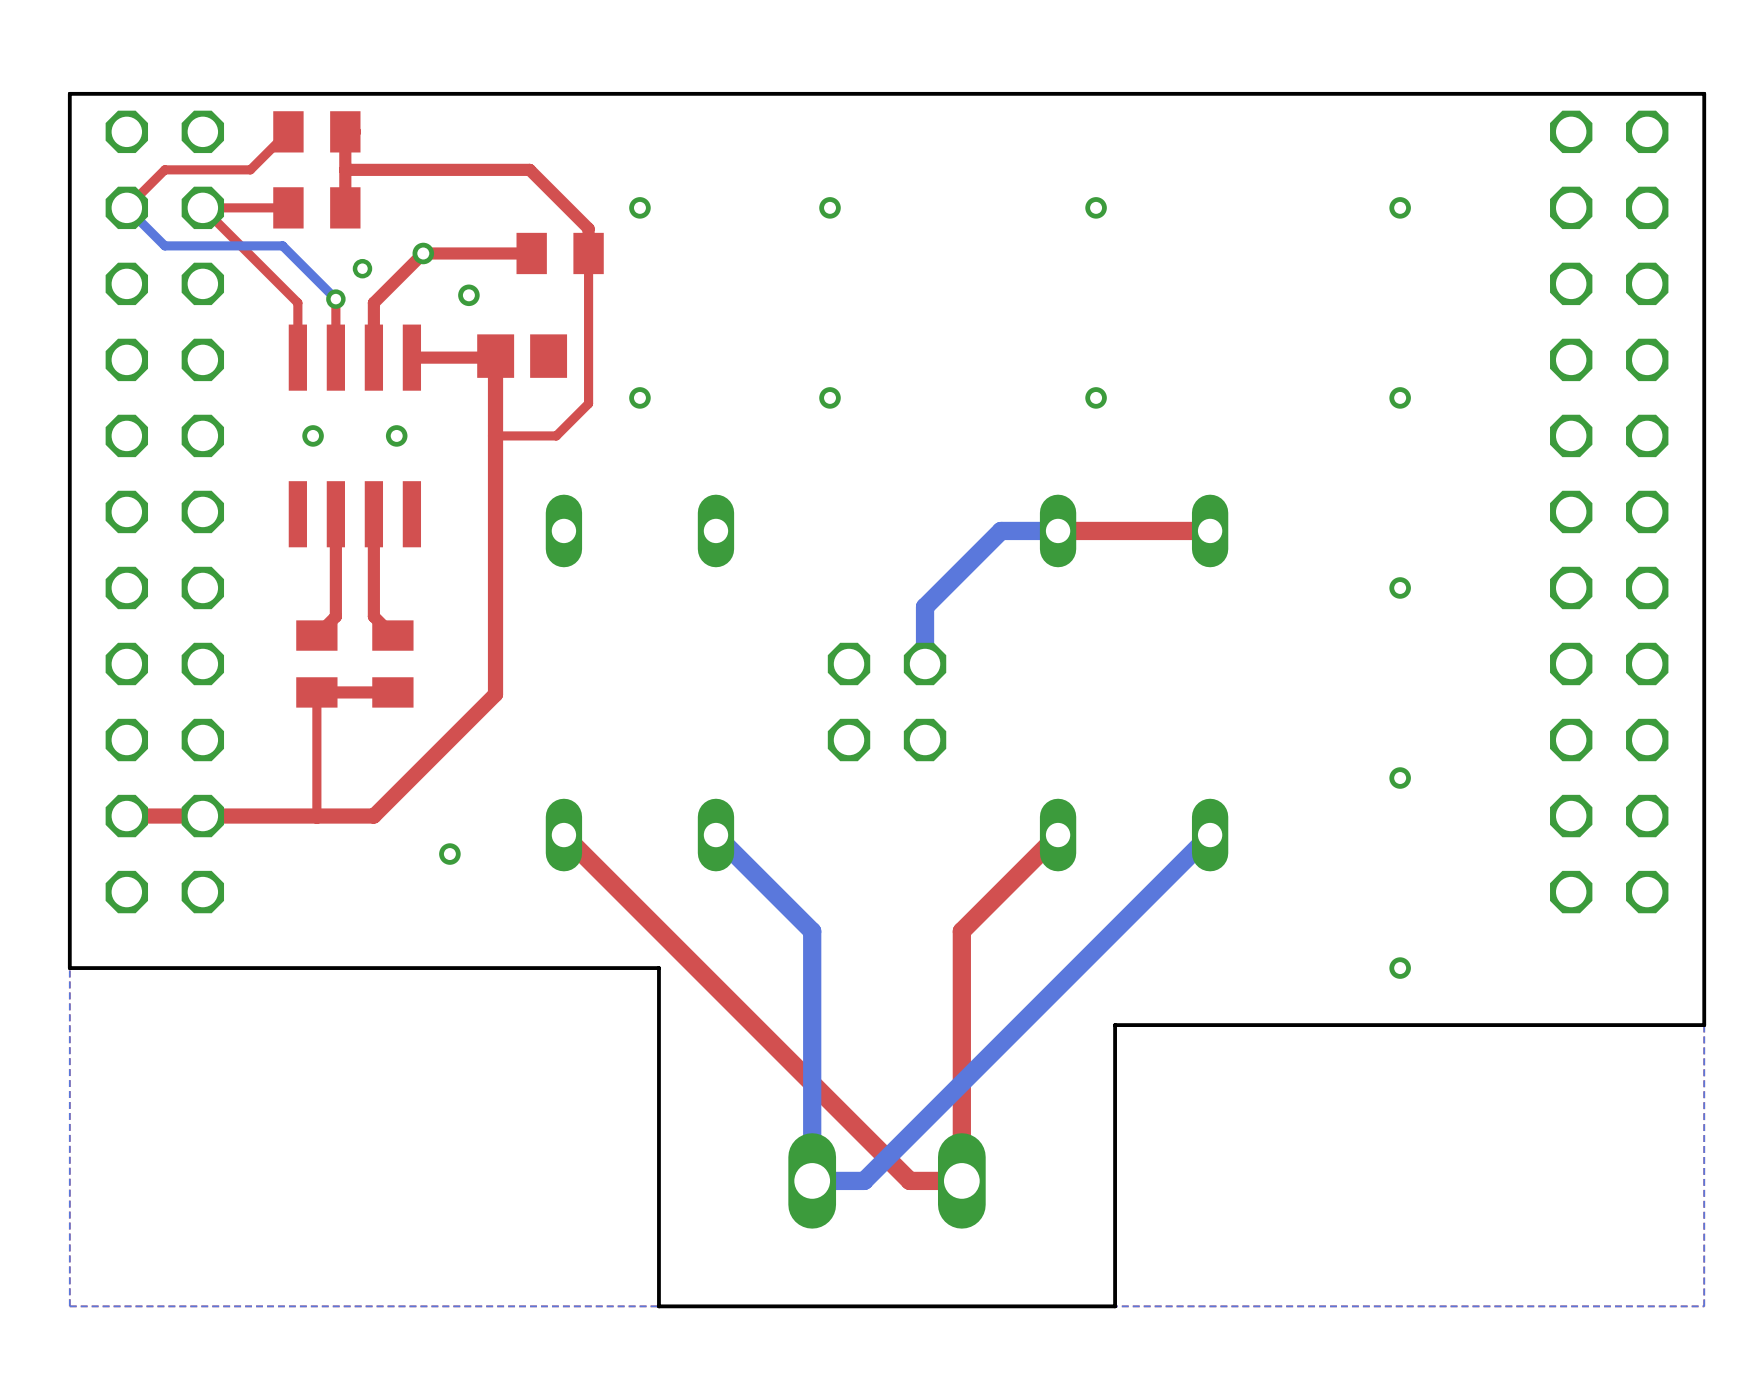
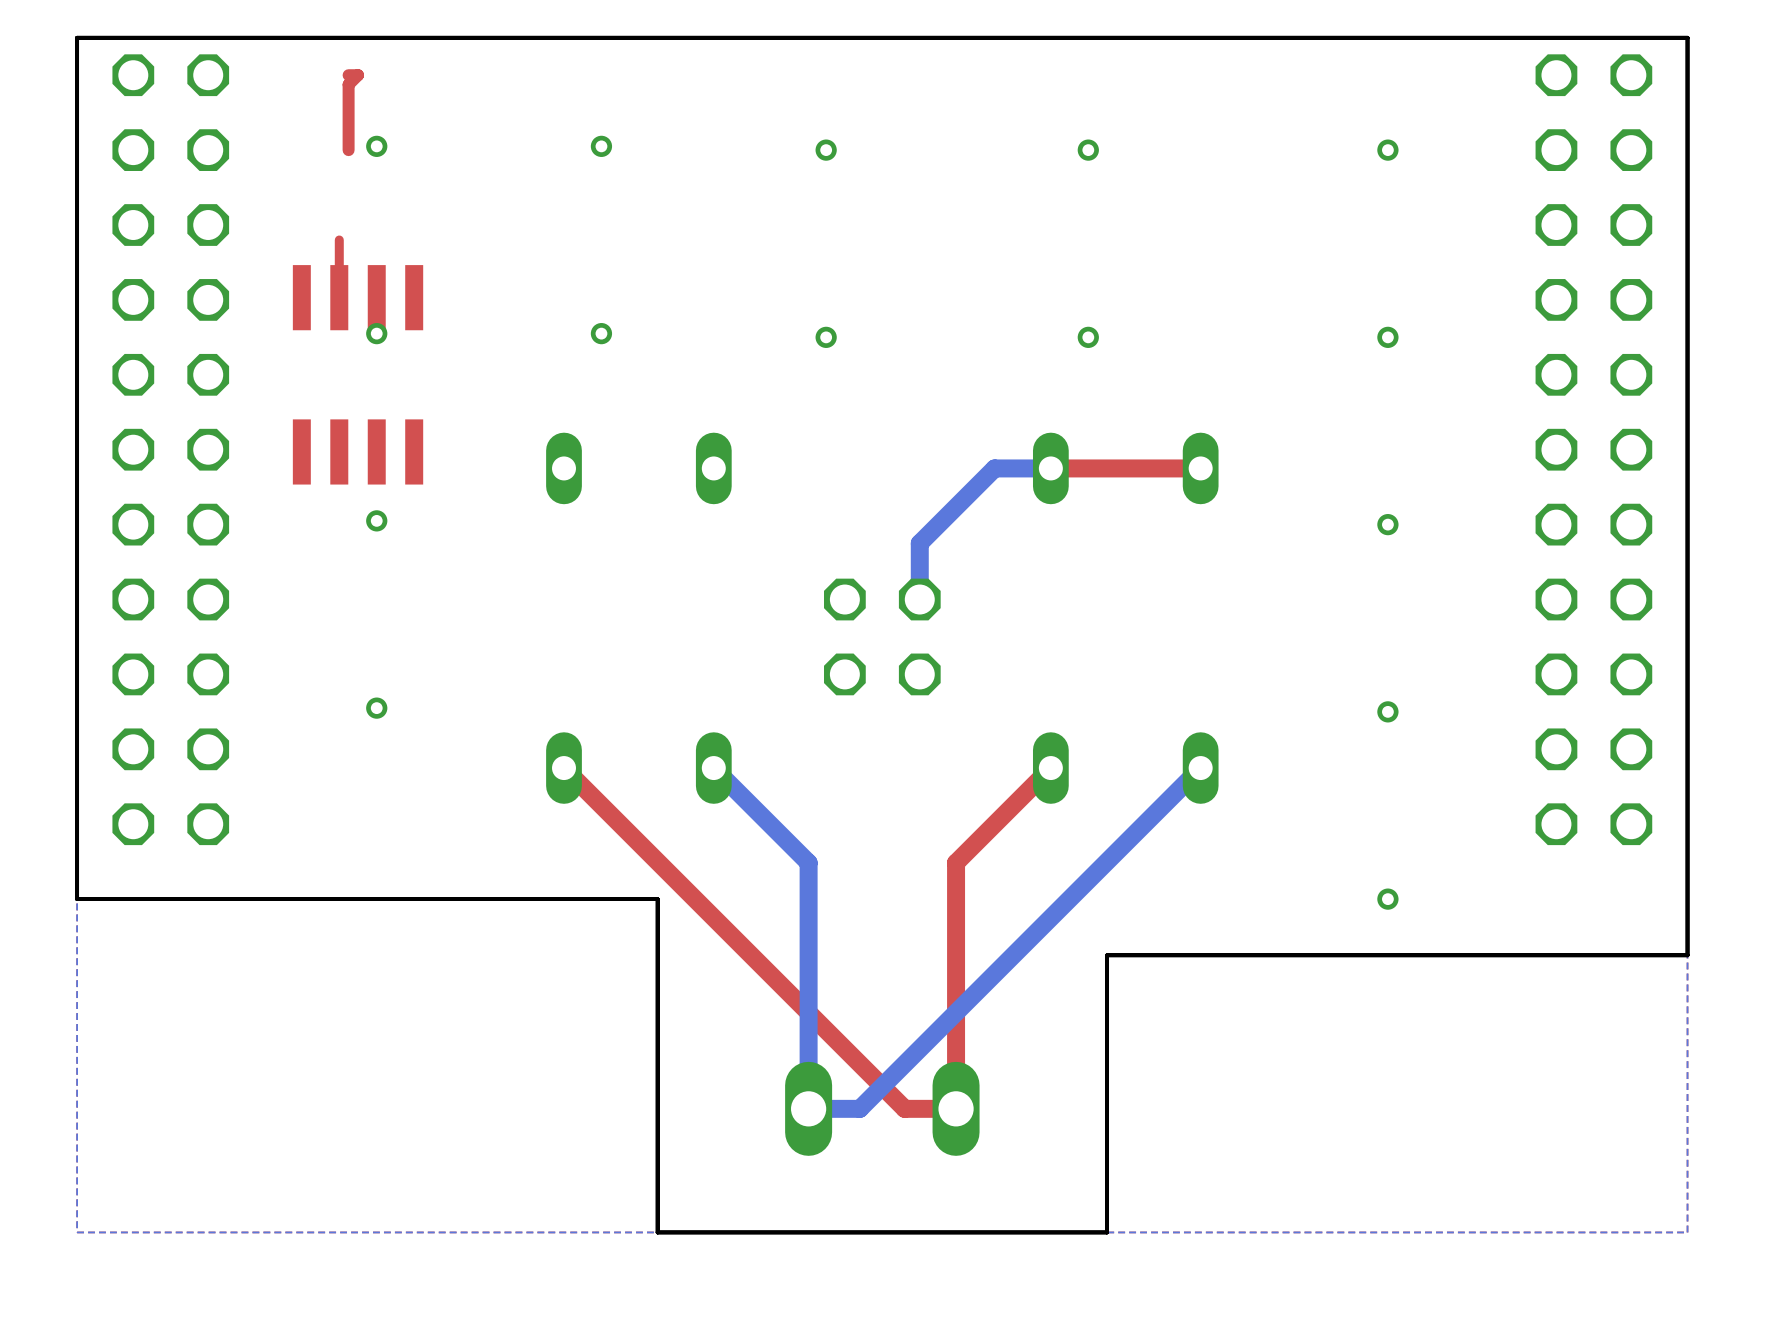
drawing: none -> [75, 35, 1690, 1235]
top track: (288, 131) (250, 169) (164, 169) (126, 207) -> none
part: (316, 131) -> none
top track: (345, 169) (529, 169) (588, 228) (588, 403) (556, 435) (495, 435) -> none
via: none -> (376, 146)
bottom track: (126, 207) (164, 245) (282, 245) (335, 299) -> none
top track: (288, 207) (202, 207) (297, 302) (297, 357) -> none
part: (316, 207) -> none
via position: (639, 207) -> (601, 146)
via: (423, 253) -> none
top track: (531, 253) (423, 253) (373, 302) (373, 357) -> none
part: (560, 253) -> none
via: (362, 268) -> none
via: (468, 295) -> none
via: (335, 299) -> none
part: (522, 356) -> none
top track: (494, 357) (411, 357) -> none
top track: (494, 357) (495, 694) (373, 816) (126, 816) -> none
via: none -> (376, 333)
via position: (639, 397) -> (601, 333)
via: (313, 435) -> none
via: (396, 435) -> none
top track: (335, 514) (335, 616) (316, 635) -> none
top track: (373, 514) (373, 616) (392, 635) -> none
via: none -> (376, 520)
part: (316, 663) -> none
part: (392, 663) -> none
top track: (392, 692) (316, 692) (316, 816) -> none
via position: (449, 854) -> (376, 708)

